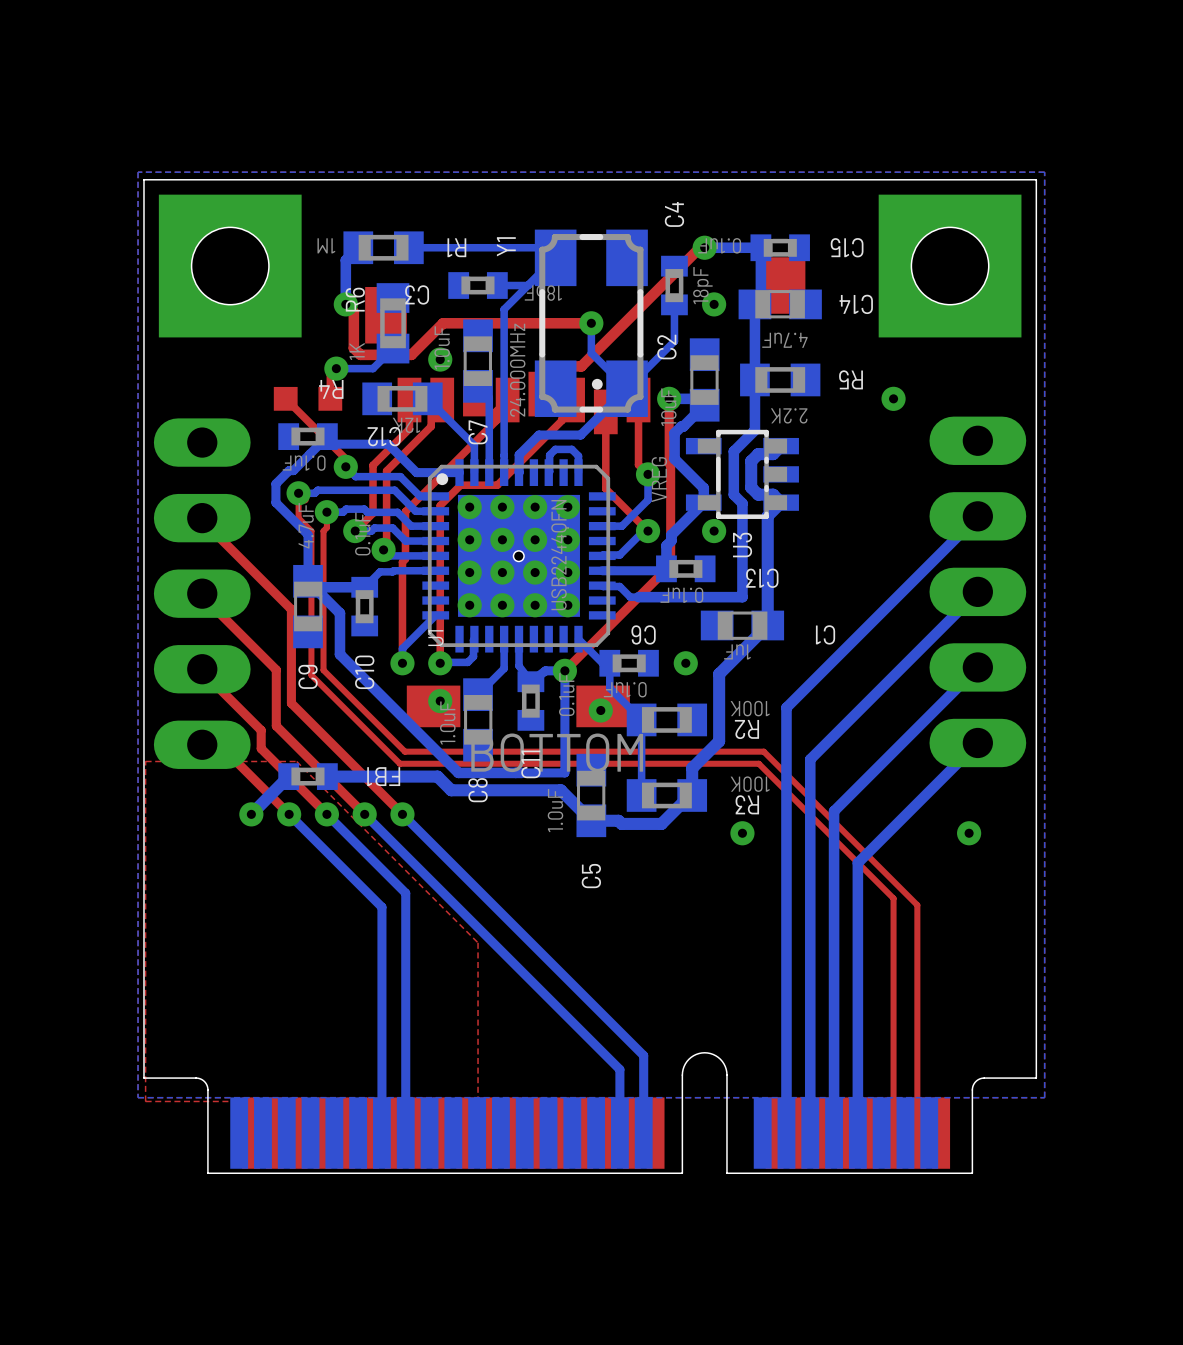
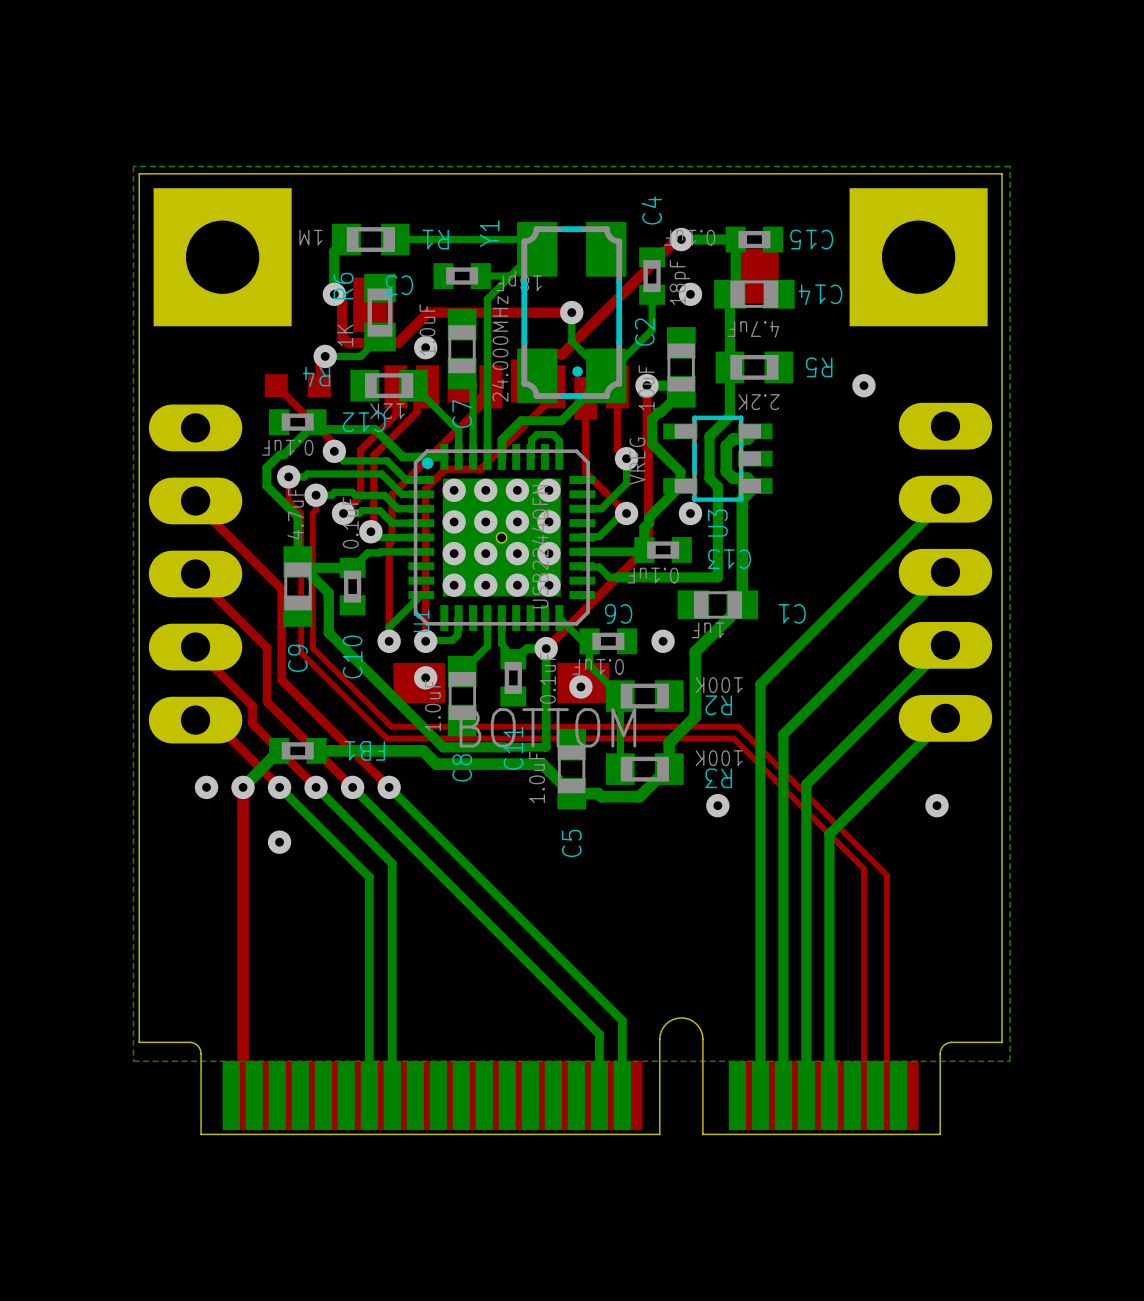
top zone outline: (296, 761) (145, 761) (145, 1101) (478, 1101) (478, 942) (296, 761) -> none
via: none -> (206, 787)
top track: none -> (243, 787) (243, 1095)
via: none -> (279, 842)

